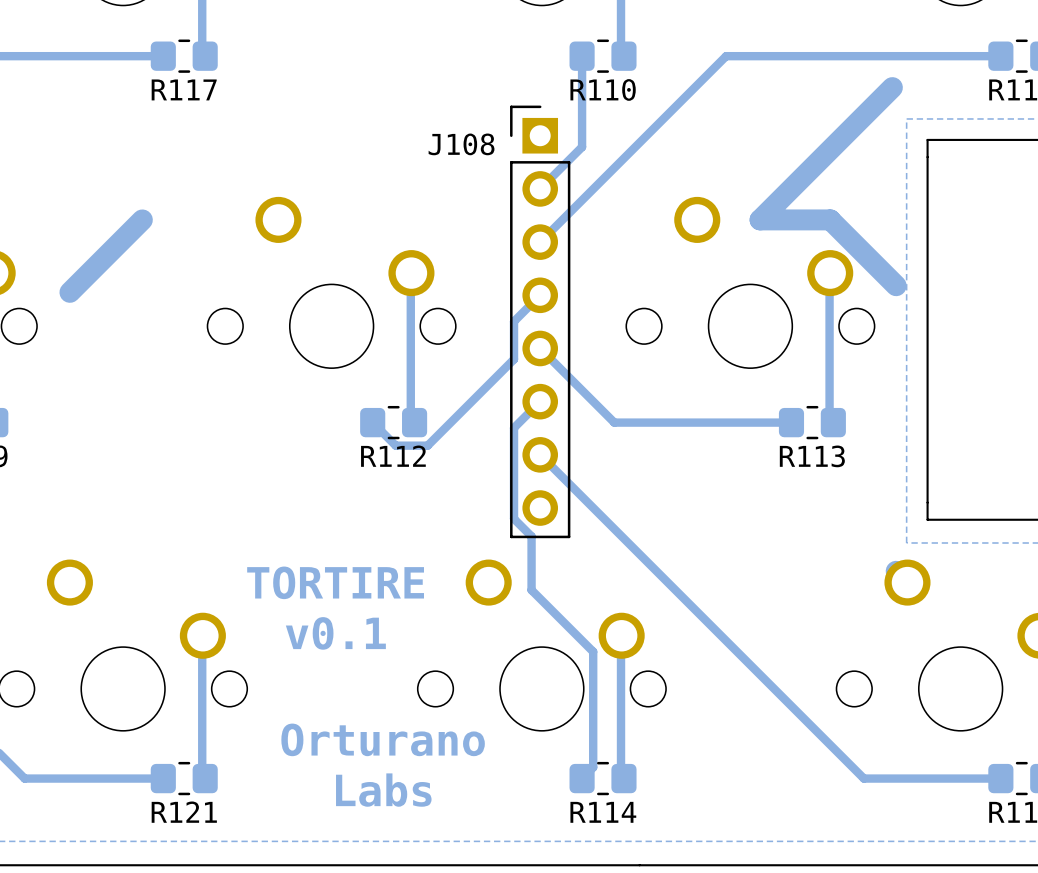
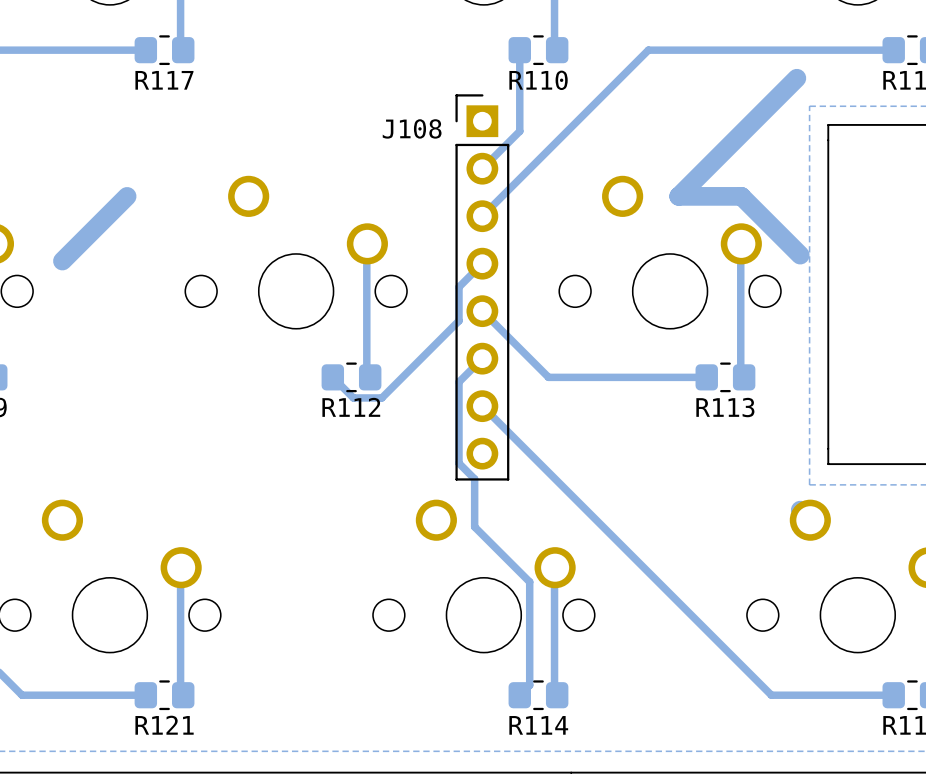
text: TORTIRE (335, 582) -> none
text: v0.1 (335, 633) -> none
text: Orturano (383, 739) -> none
text: Labs (383, 790) -> none

